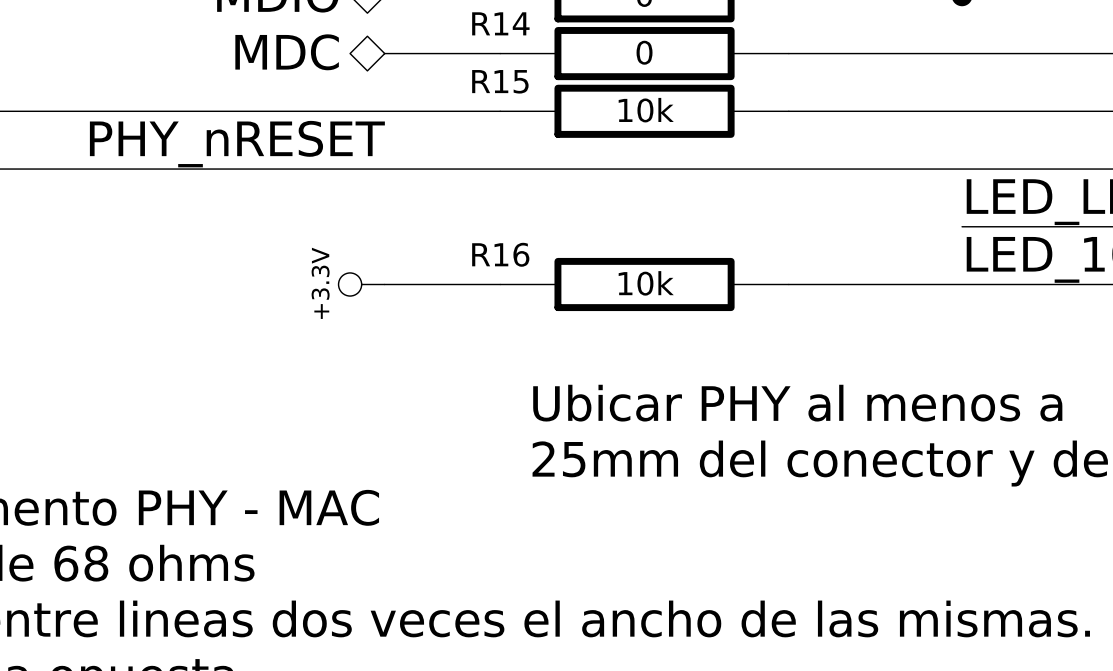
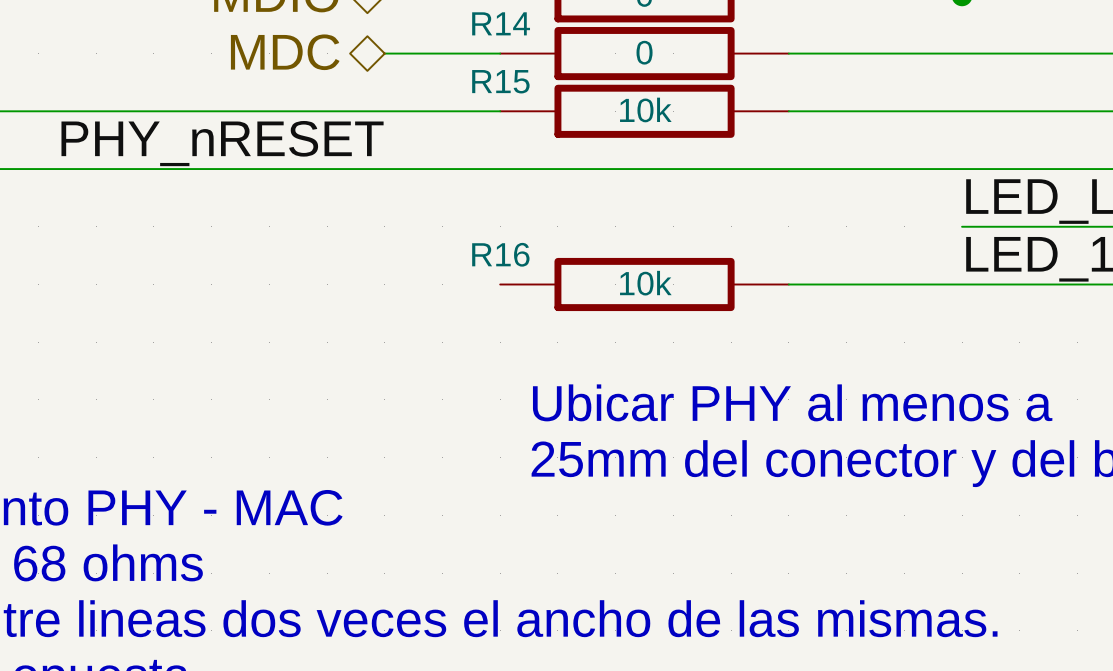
power symbol: +3.3V (361, 284) -> none
wire: (384, 284) (500, 284) -> none

